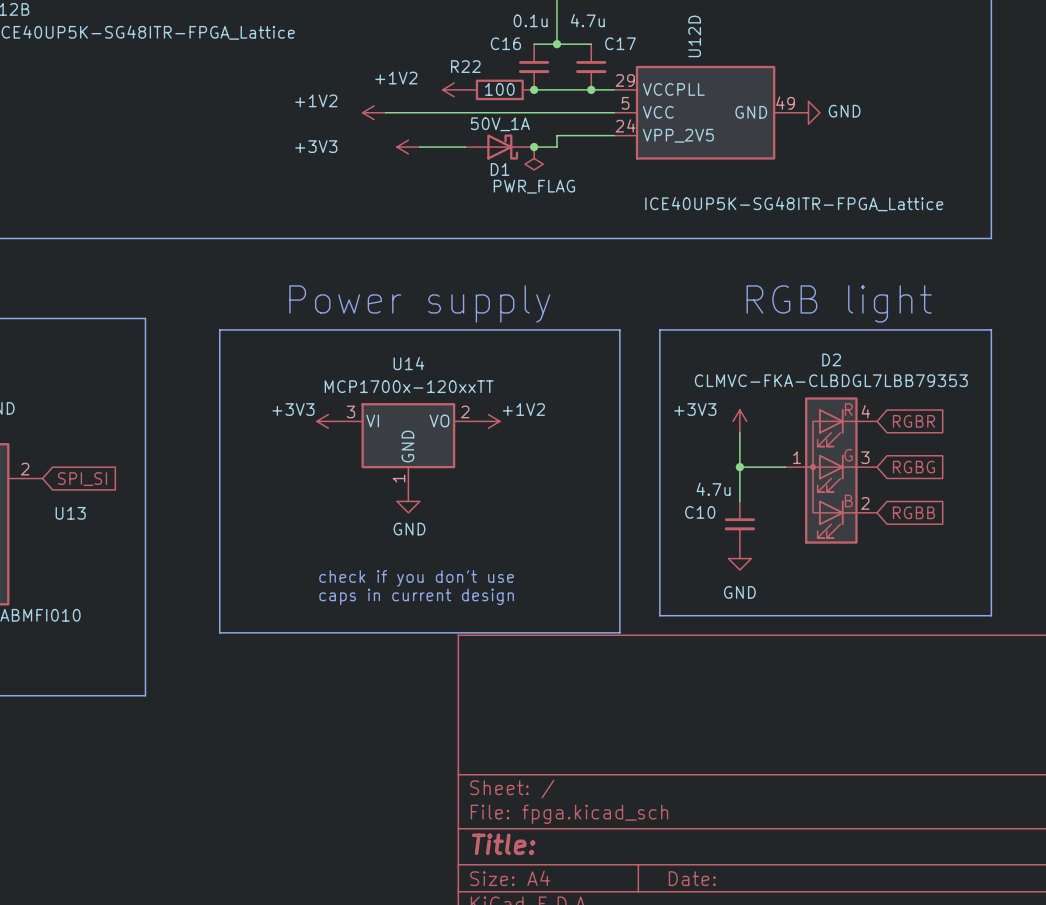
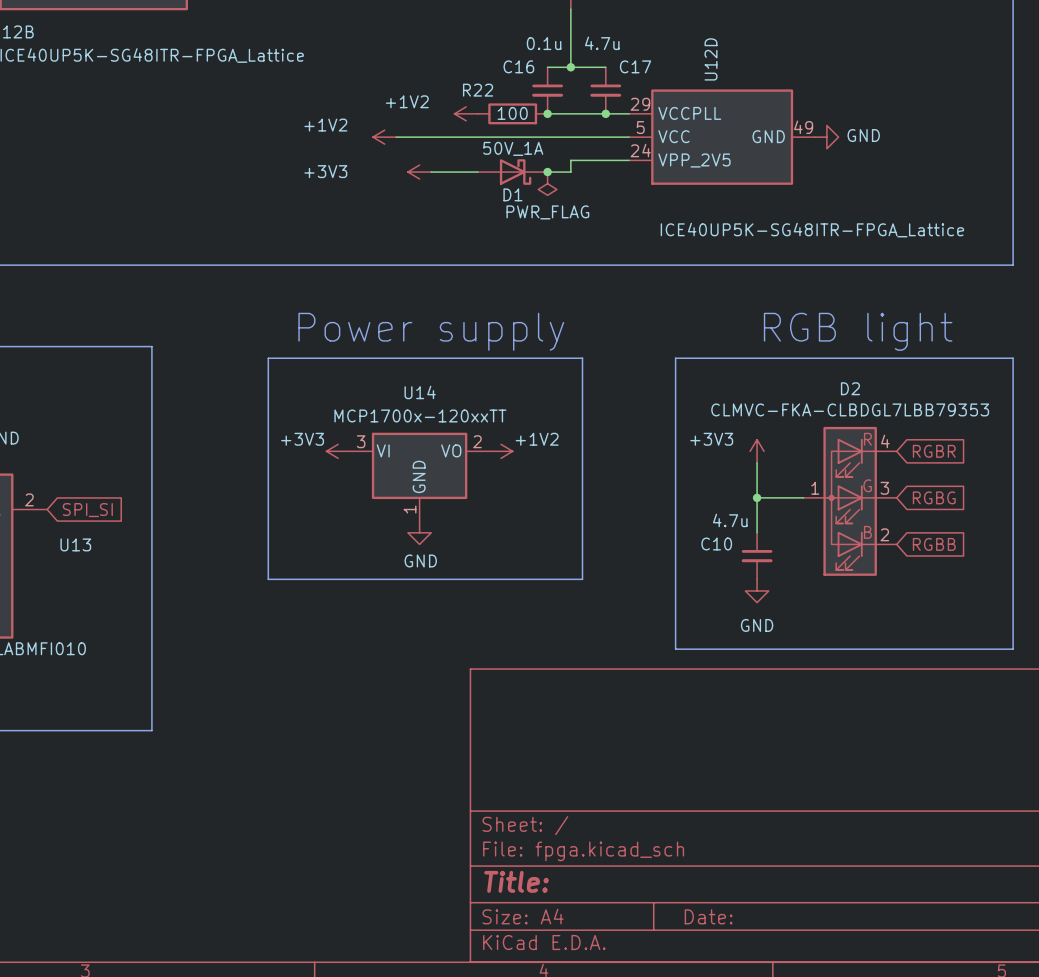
line: (259, 329) (219, 329) (219, 632) (619, 632) (619, 329) (568, 329) -> (268, 358) (268, 579) (582, 579) (582, 358)
text: check if you don't use (416, 578) -> none
text: caps in current design (416, 596) -> none

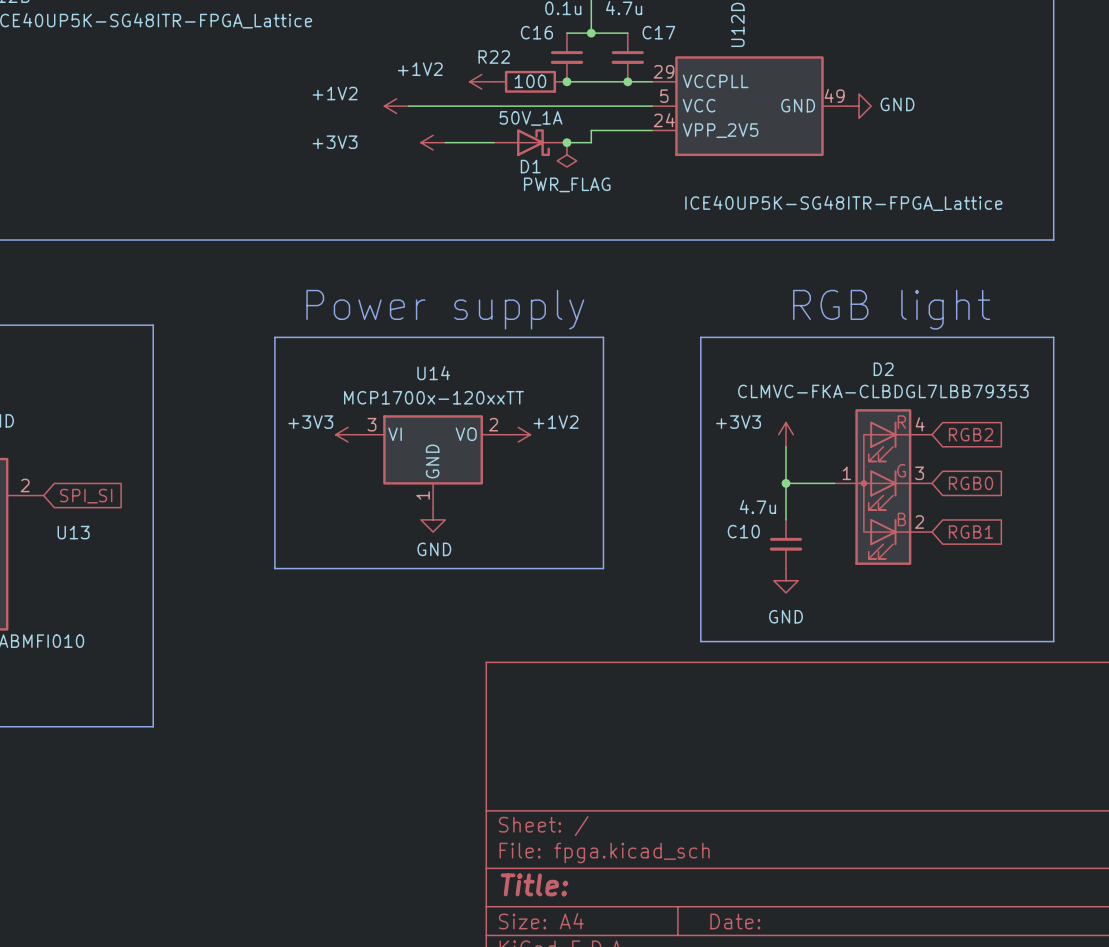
global label: RGBR (934, 451) -> RGB2 (971, 434)
global label: RGBG (934, 497) -> RGB0 (971, 483)
global label: RGBB (934, 544) -> RGB1 (971, 532)

